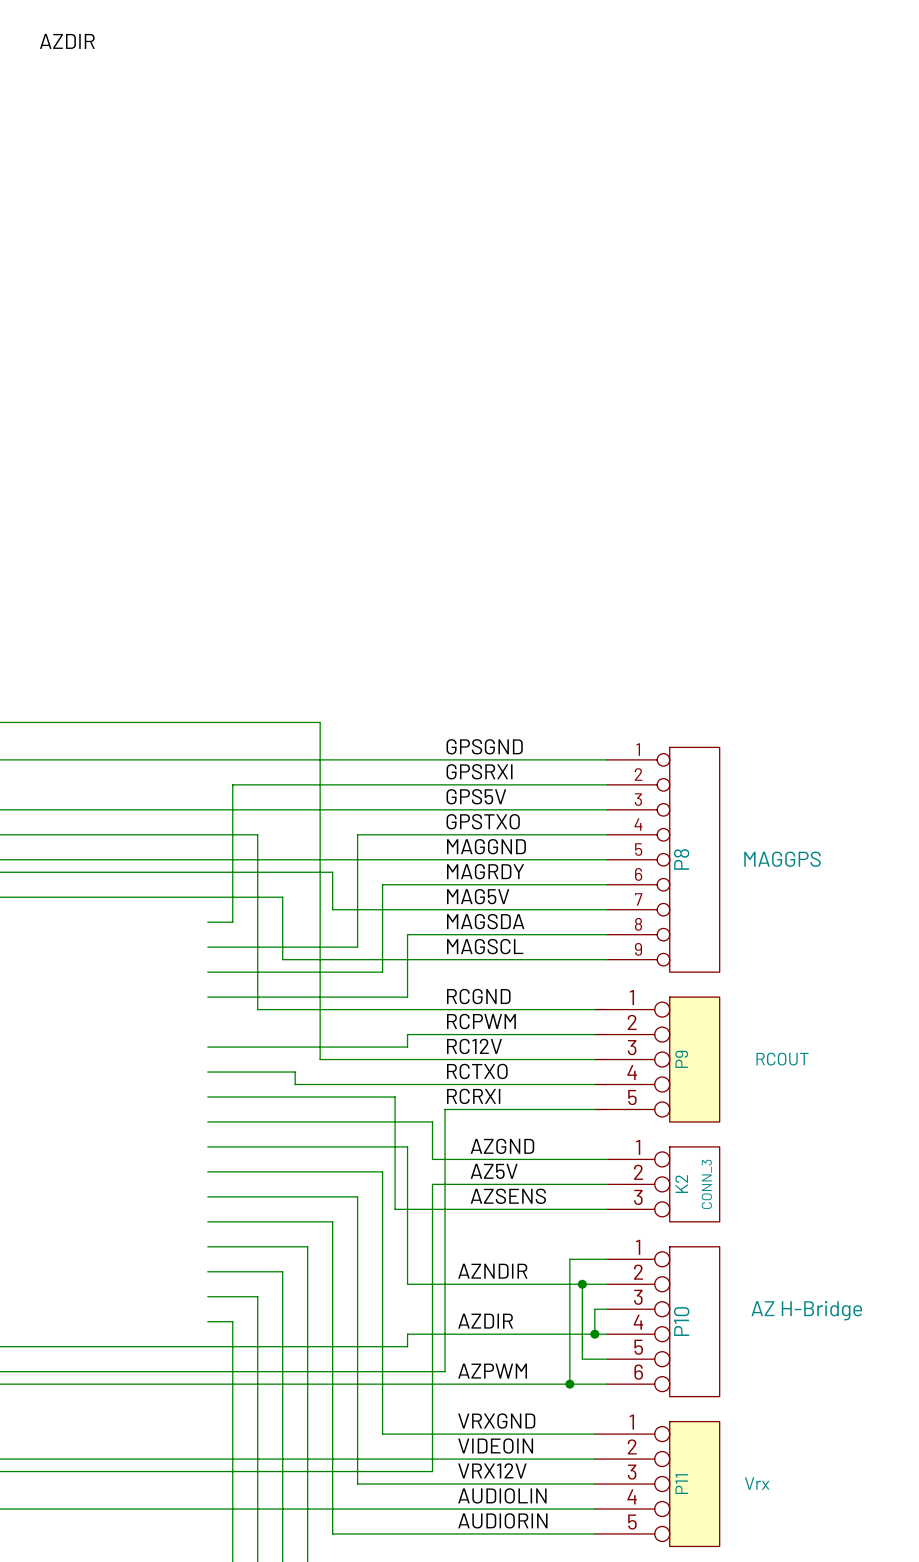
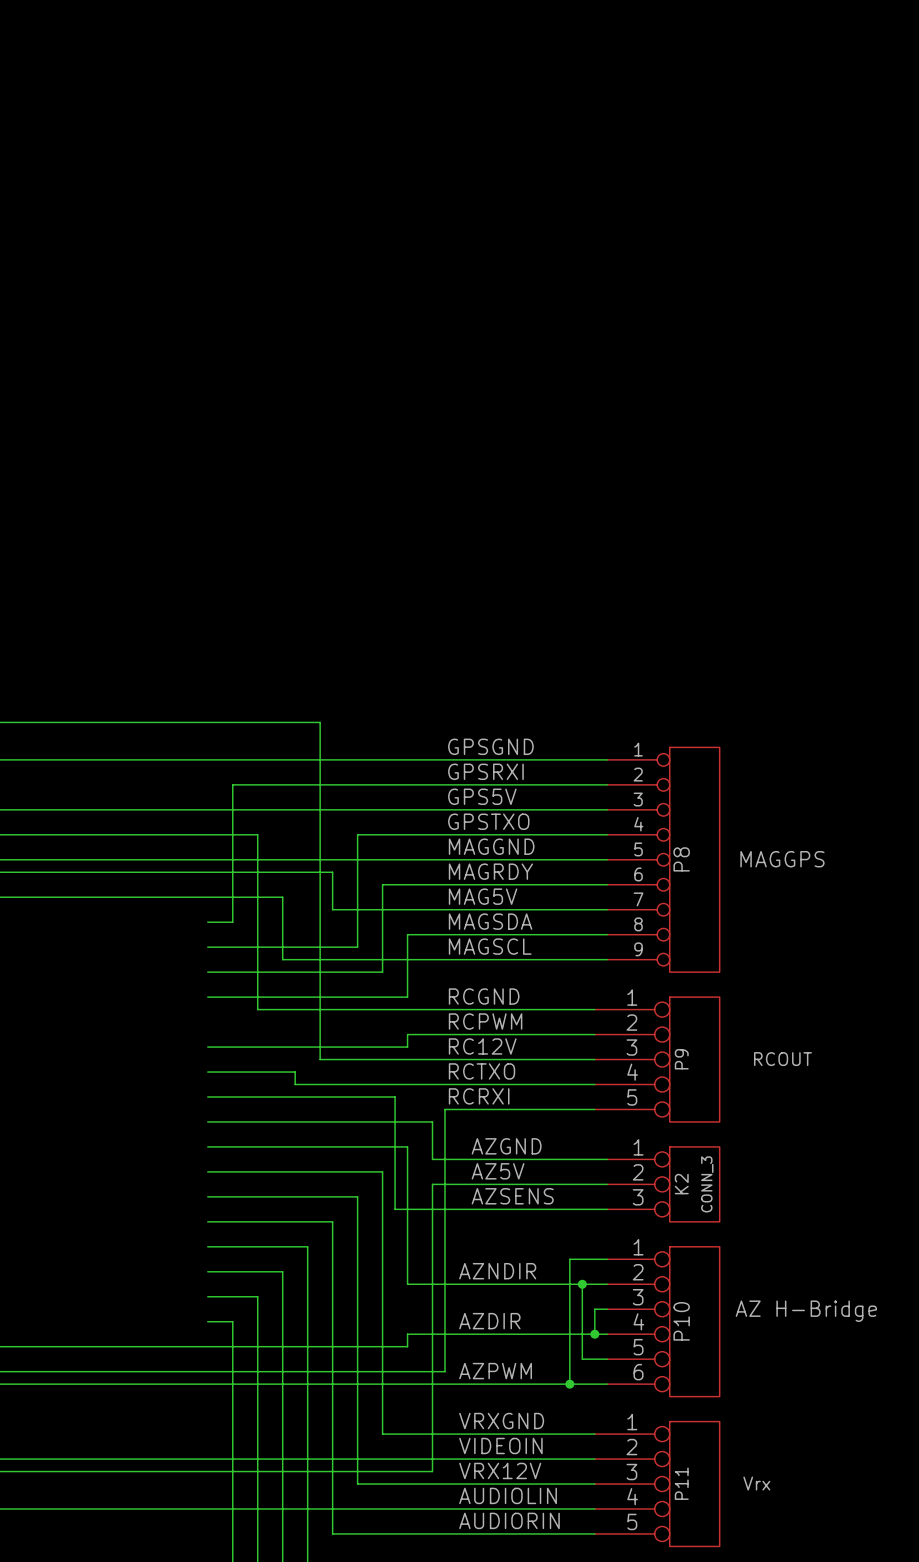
label: AZDIR (67, 41) -> none

